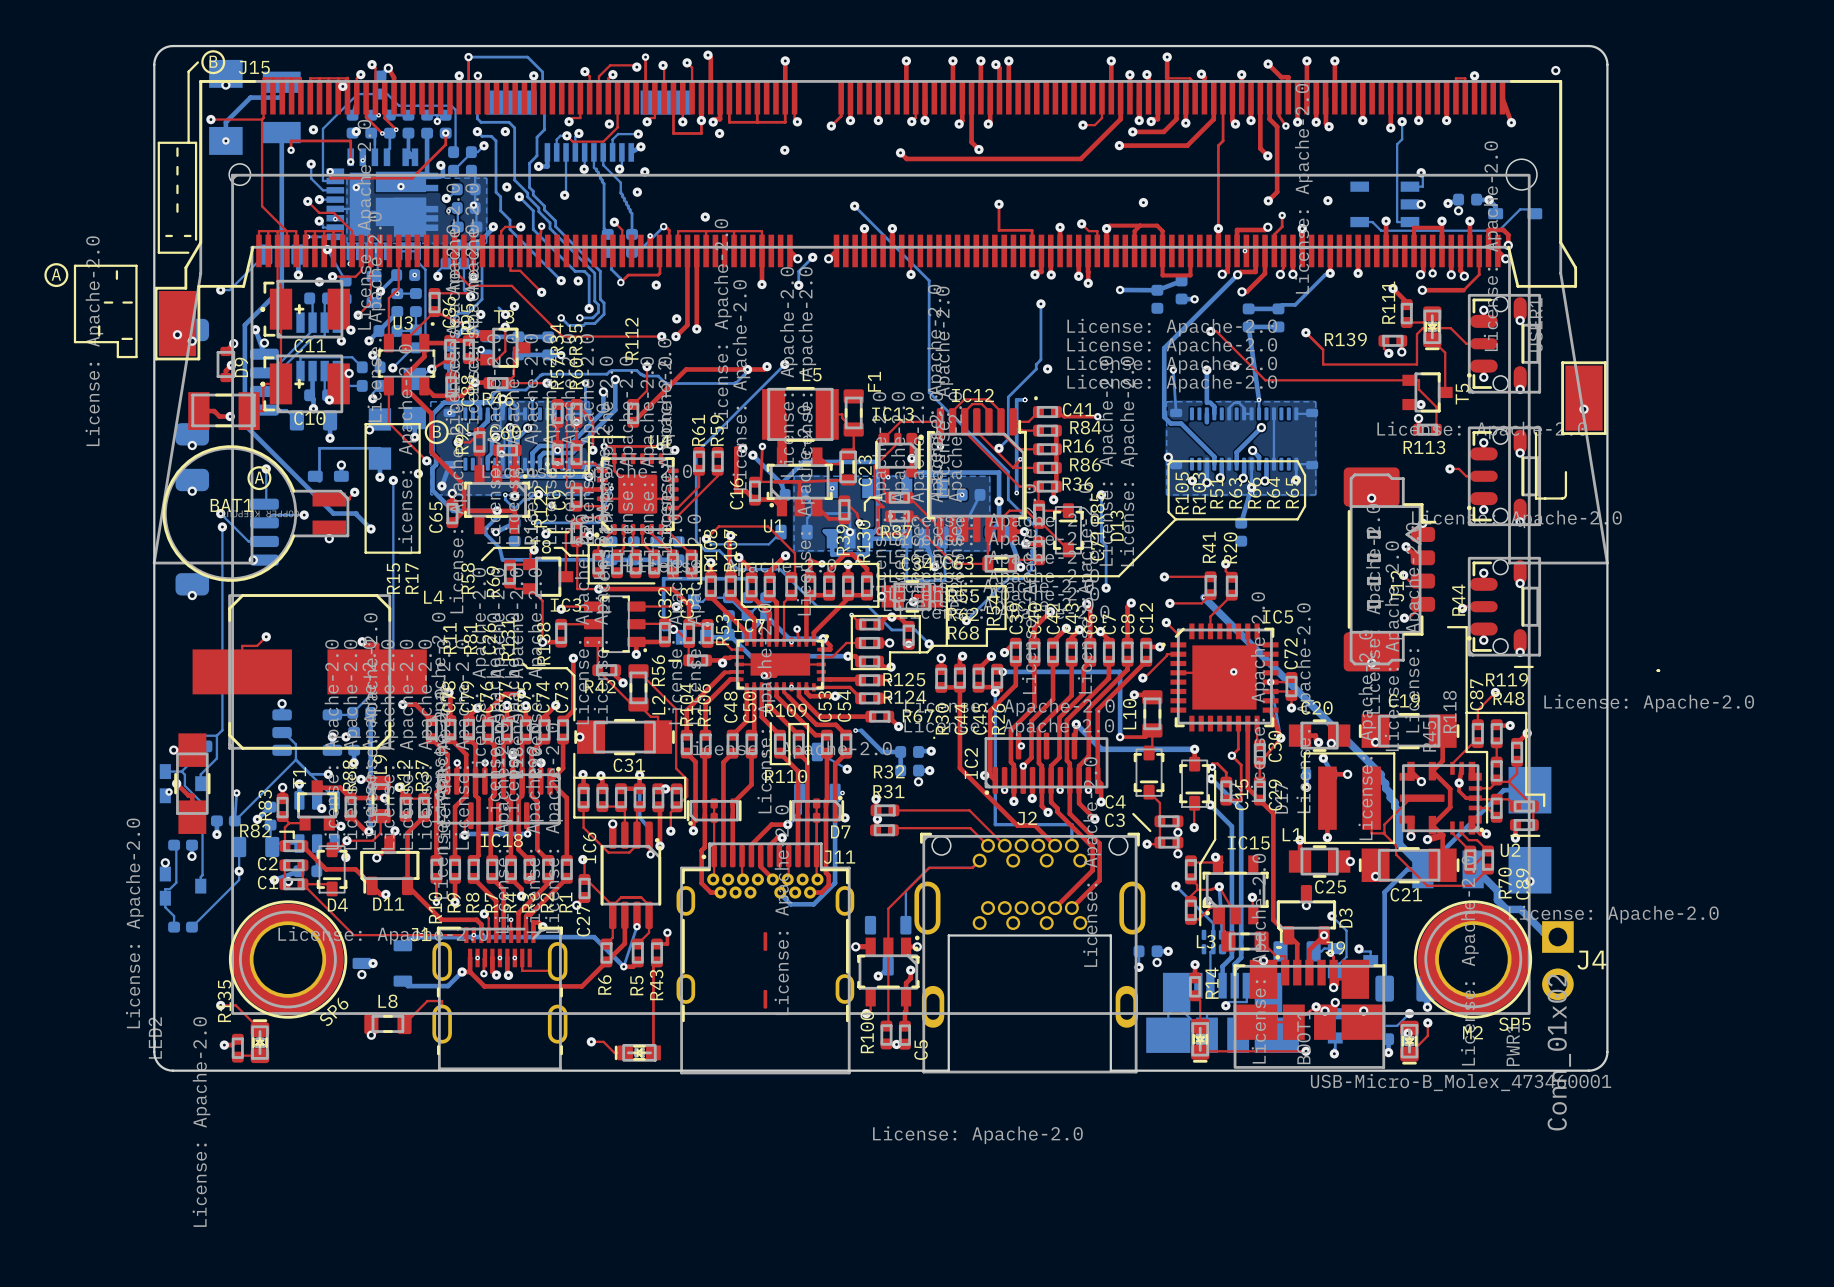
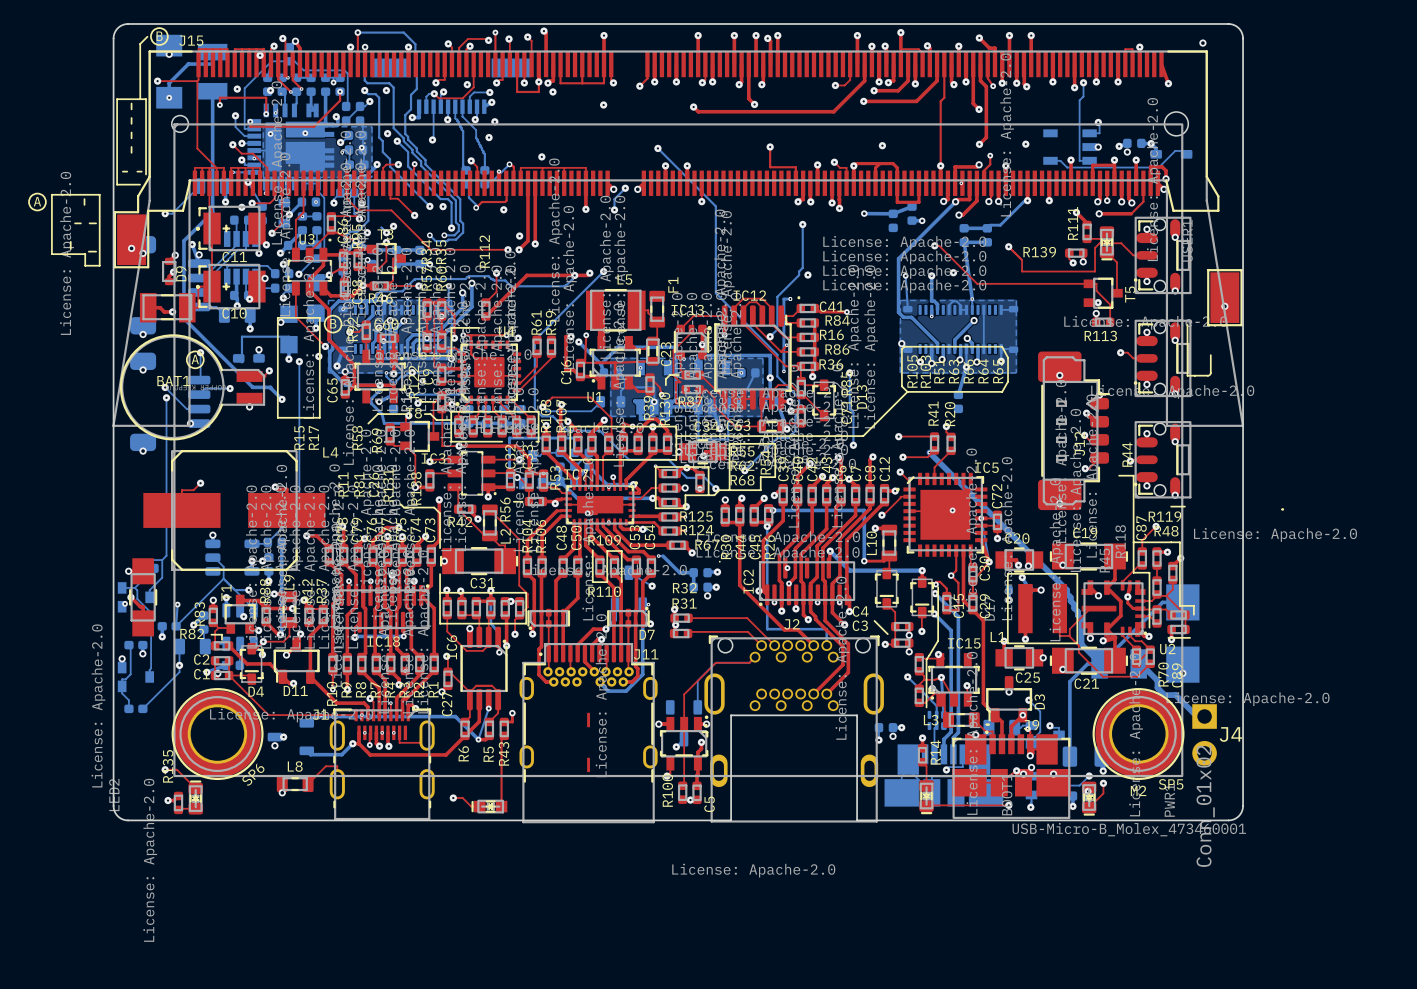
via: none -> (931, 316)

